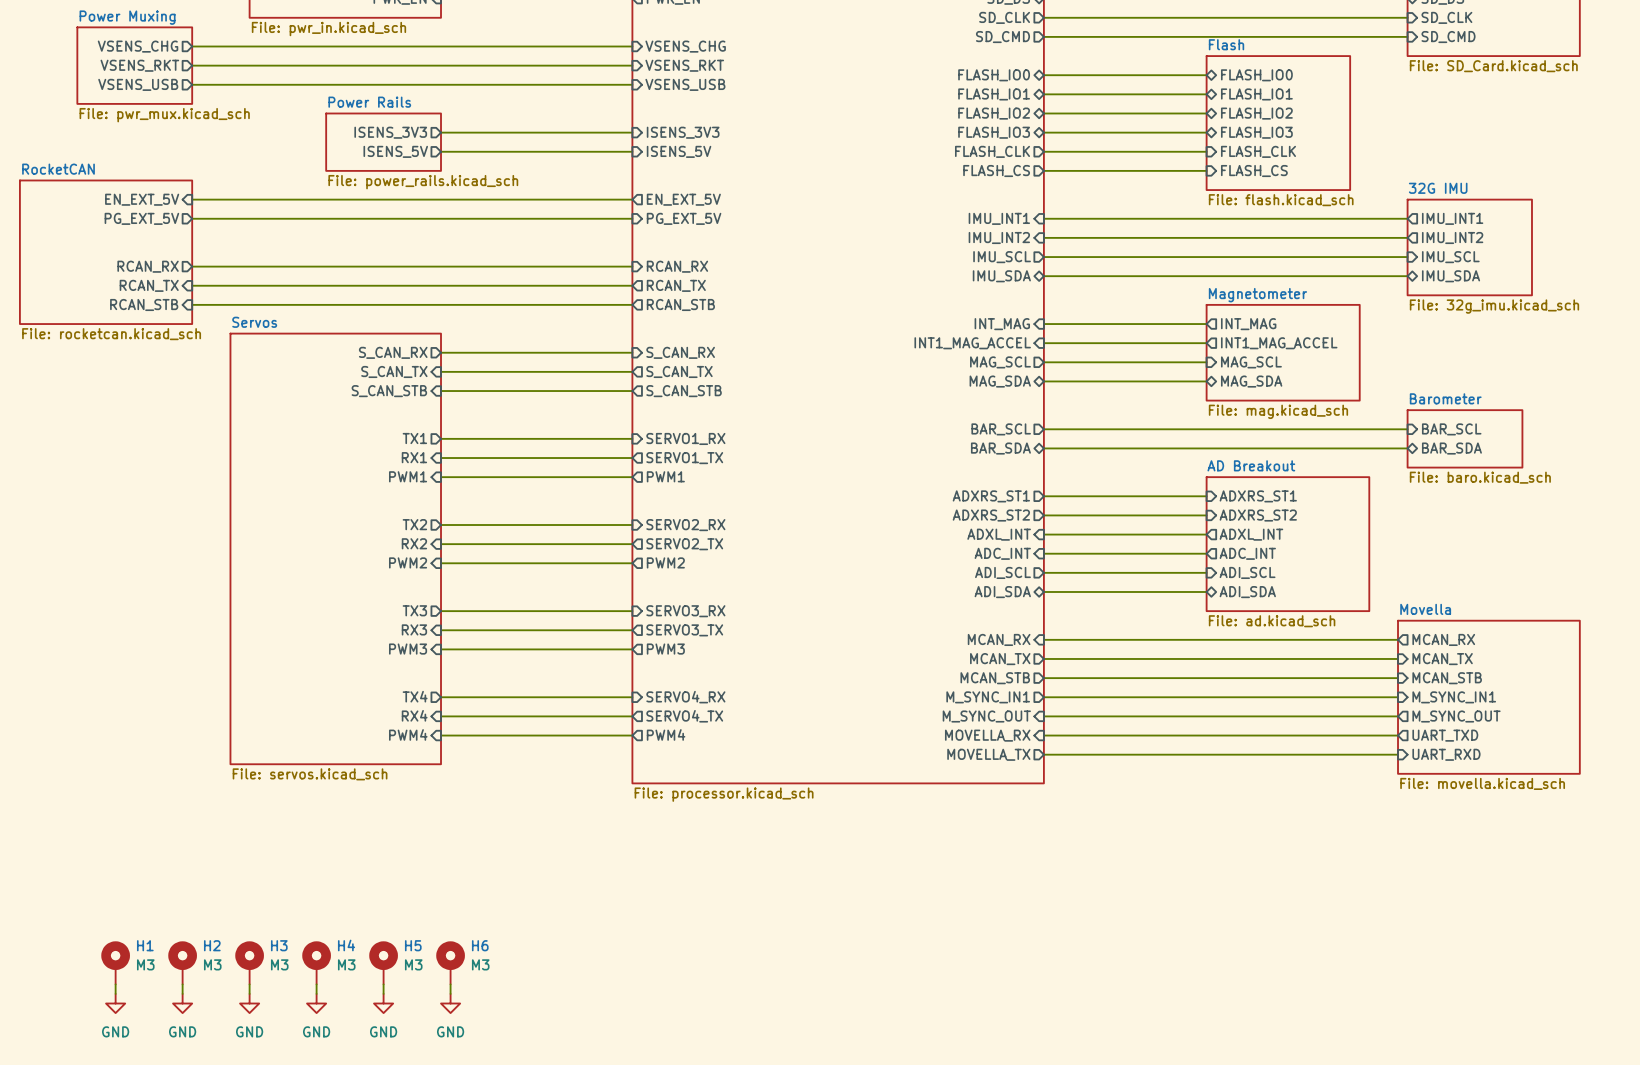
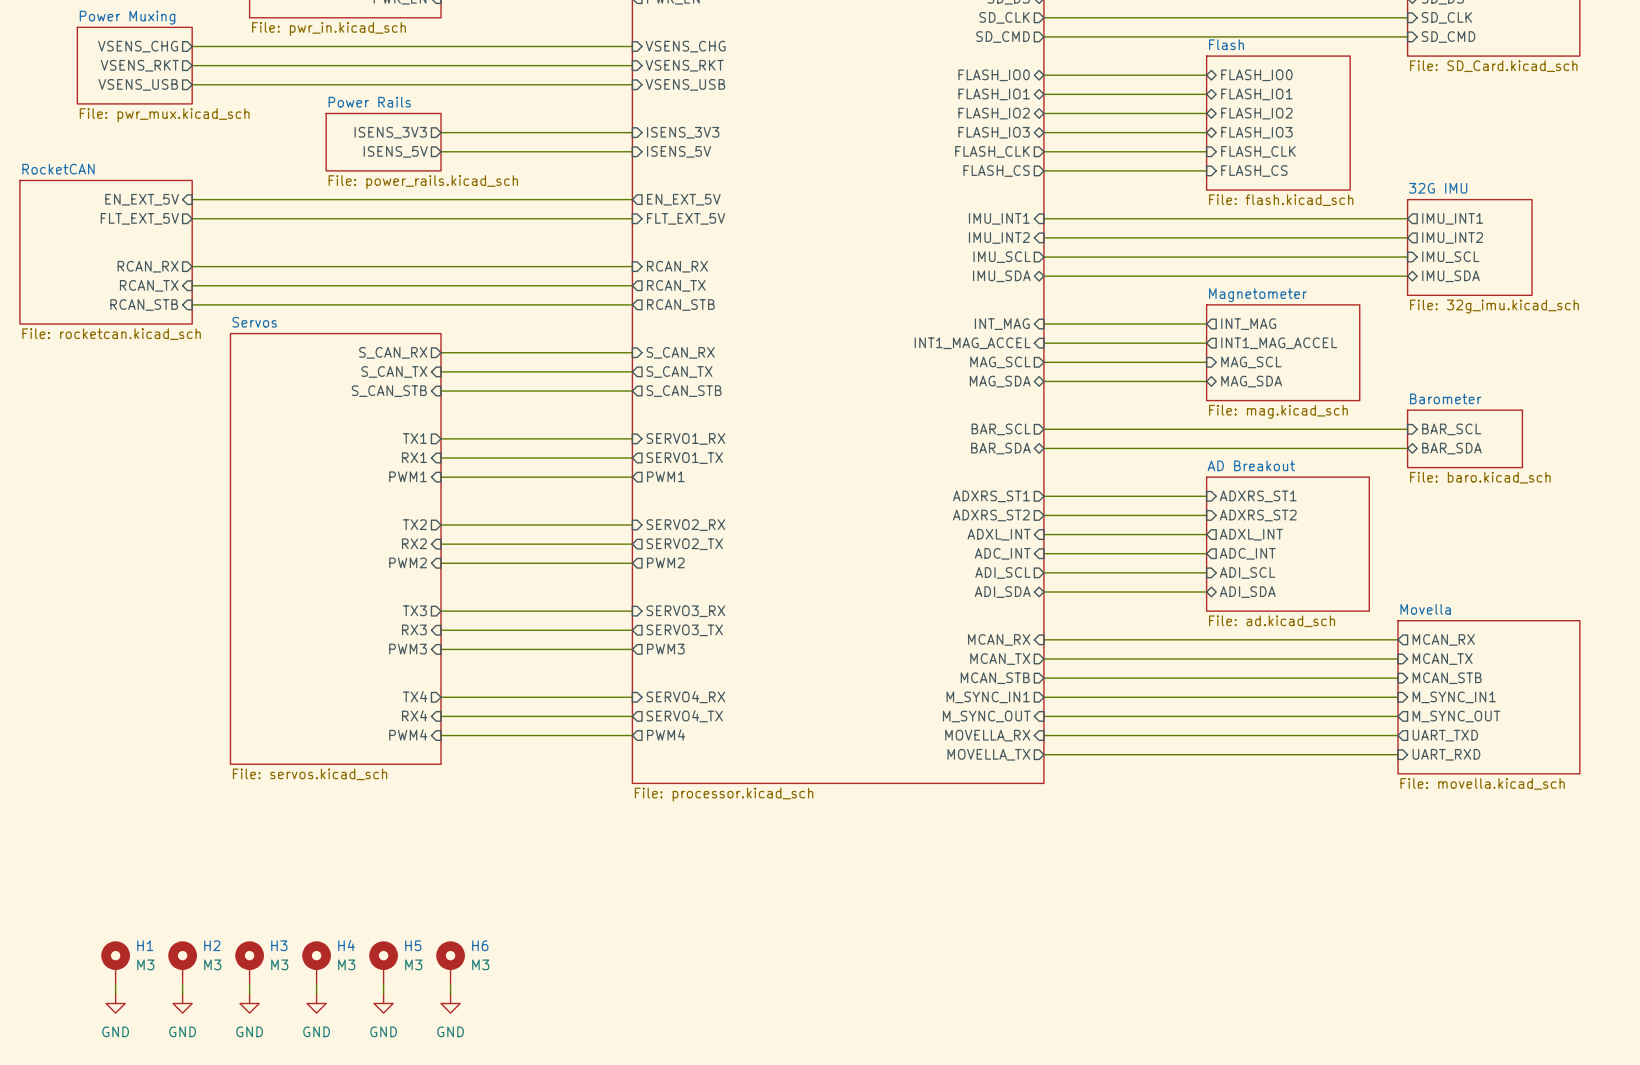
sheet pin: PG_EXT_5V (141, 218) -> FLT_EXT_5V (139, 218)
sheet pin: PG_EXT_5V (684, 218) -> FLT_EXT_5V (686, 218)

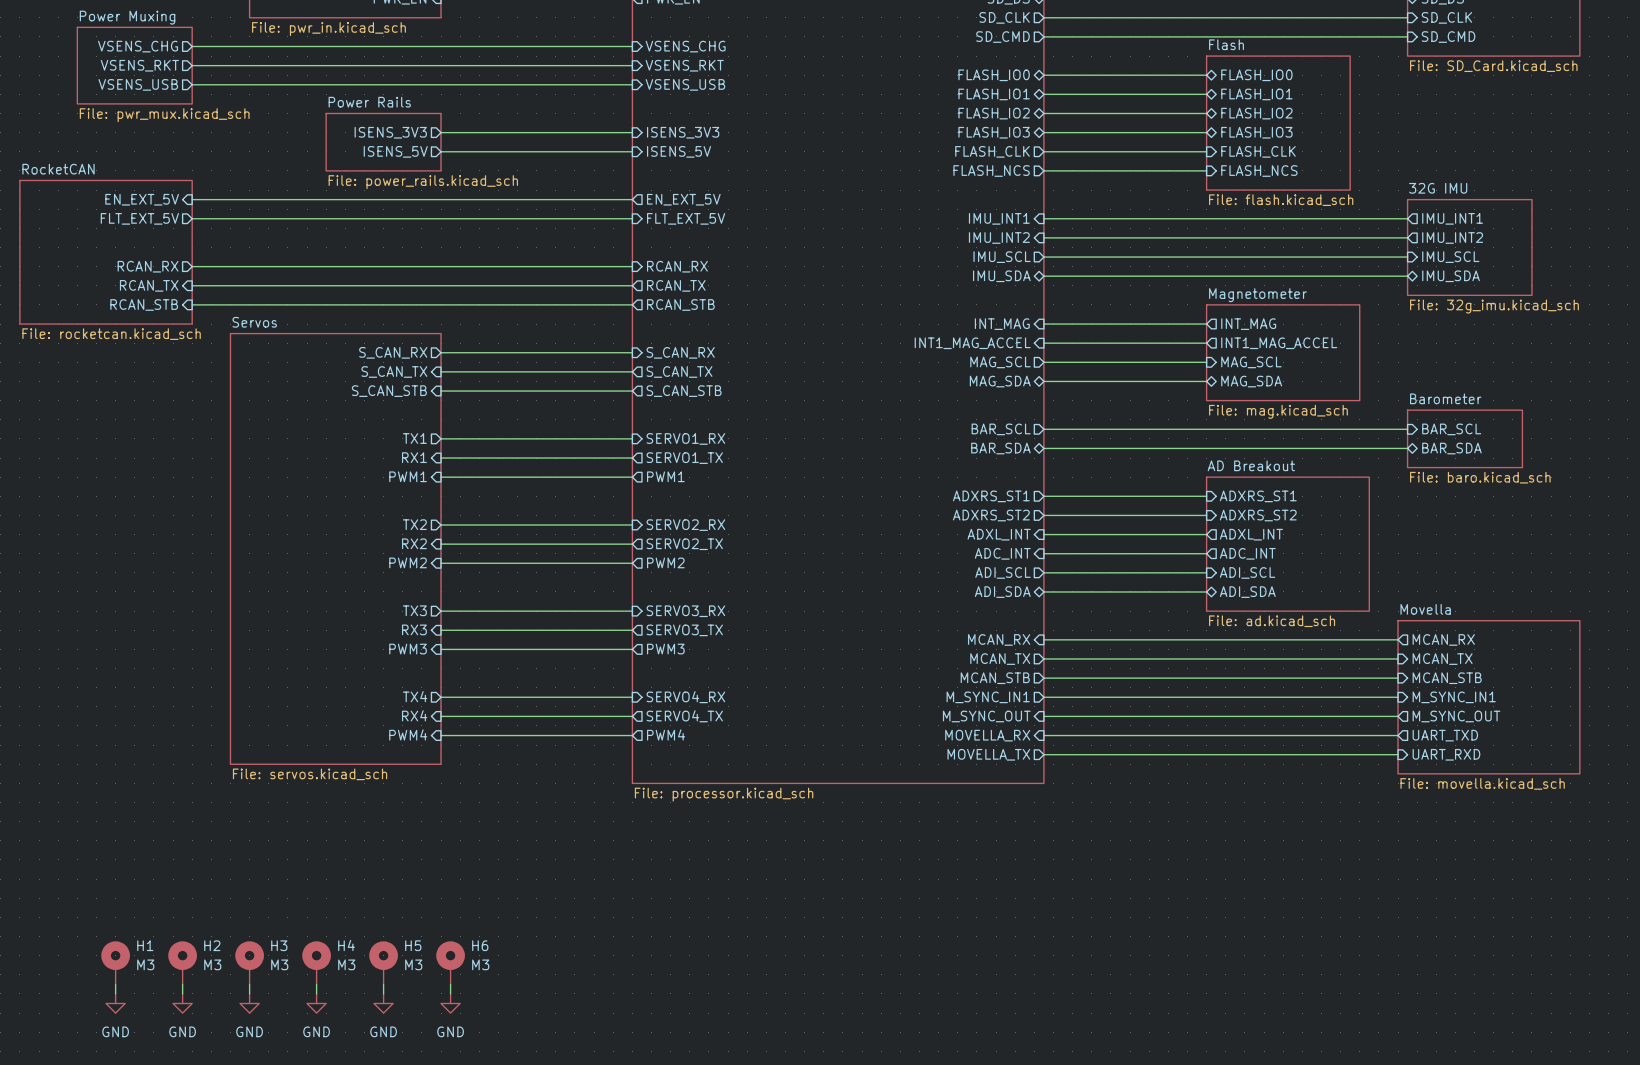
sheet pin: FLASH_CS (996, 171) -> FLASH_NCS (991, 171)
sheet pin: FLASH_CS (1254, 171) -> FLASH_NCS (1259, 171)

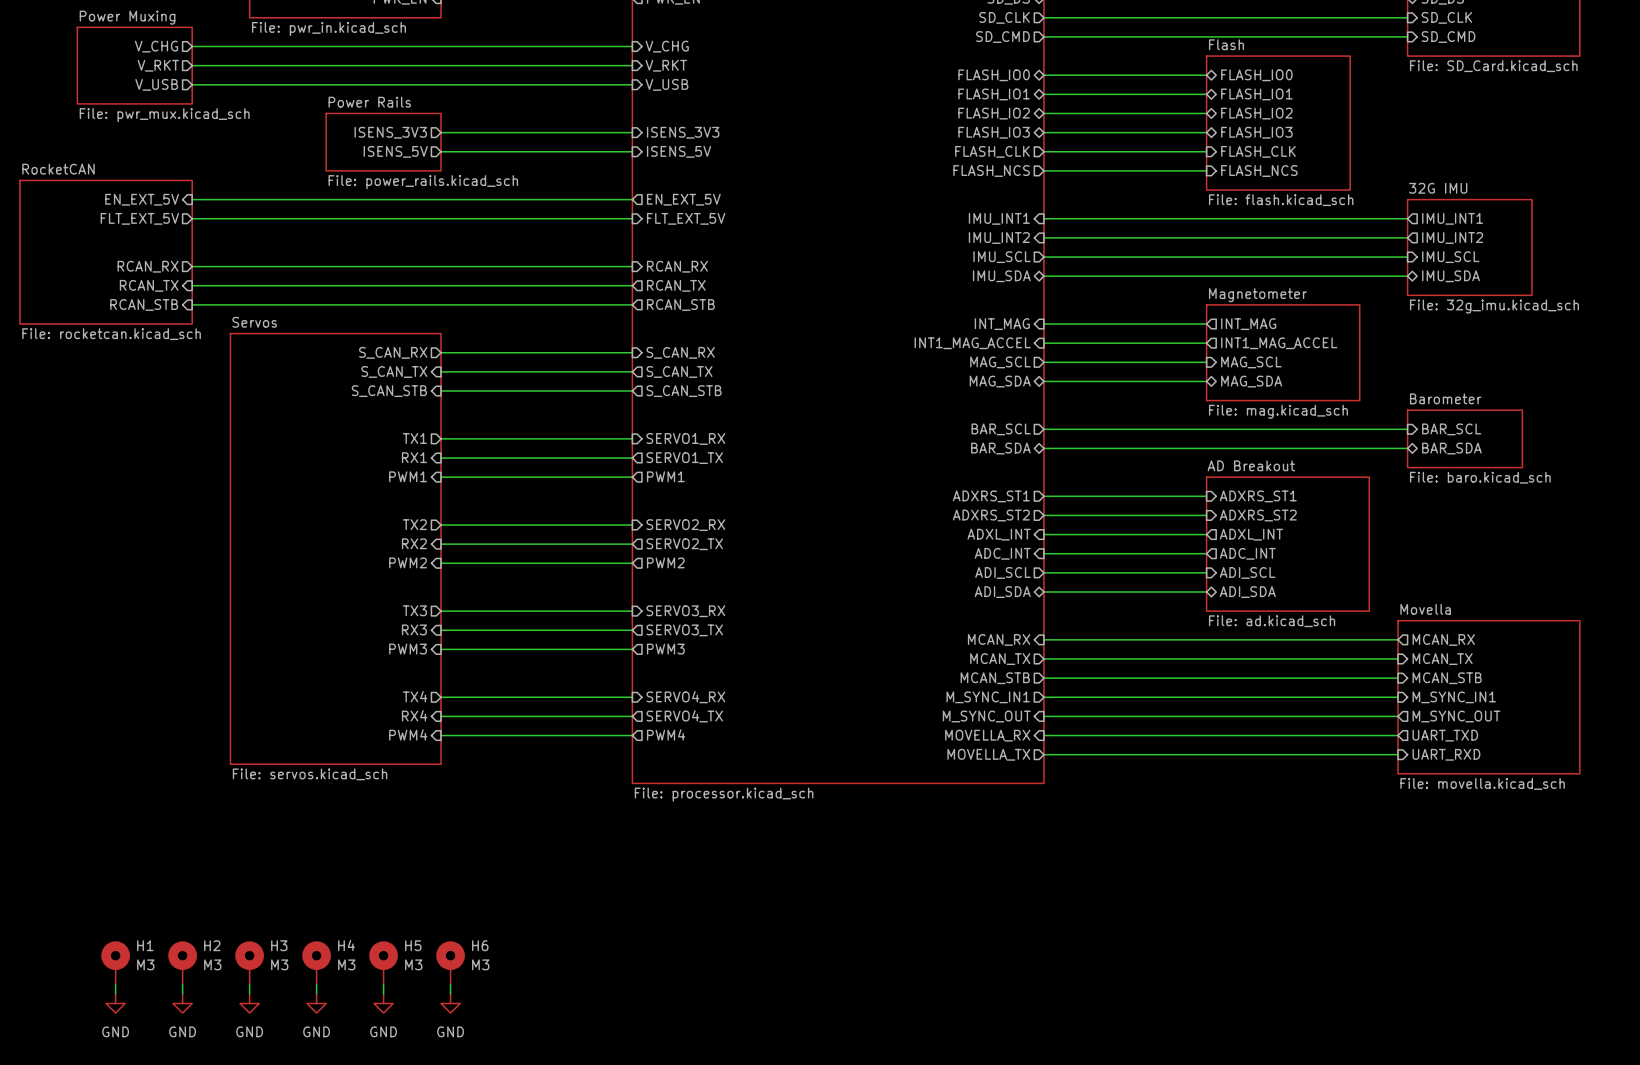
sheet pin: VSENS_CHG (138, 46) -> V_CHG (156, 46)
sheet pin: VSENS_CHG (685, 46) -> V_CHG (667, 46)
sheet pin: VSENS_RKT (139, 65) -> V_RKT (158, 65)
sheet pin: VSENS_RKT (684, 65) -> V_RKT (666, 65)
sheet pin: VSENS_USB (138, 84) -> V_USB (156, 84)
sheet pin: VSENS_USB (685, 84) -> V_USB (666, 84)

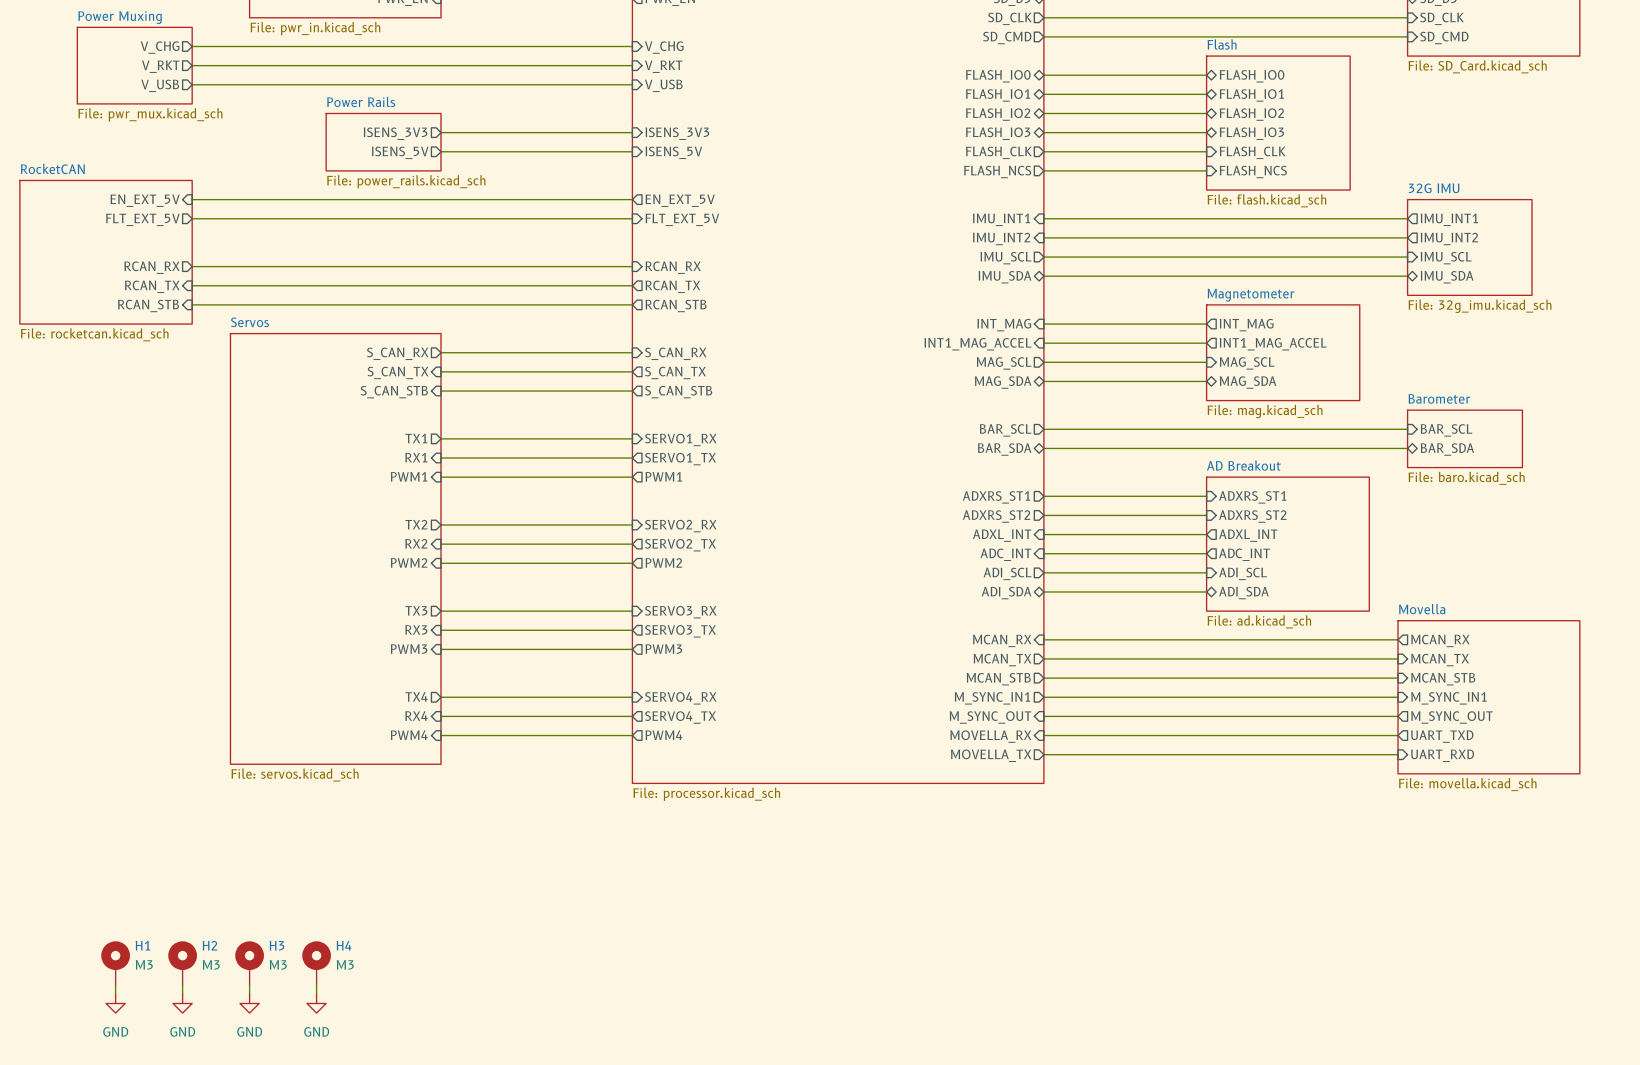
H5: M3 (383, 962) -> none
H6: M3 (450, 962) -> none
wire: (383, 984) (383, 993) -> none
wire: (450, 984) (450, 993) -> none
power symbol: GND (383, 1003) -> none
power symbol: GND (450, 1003) -> none

